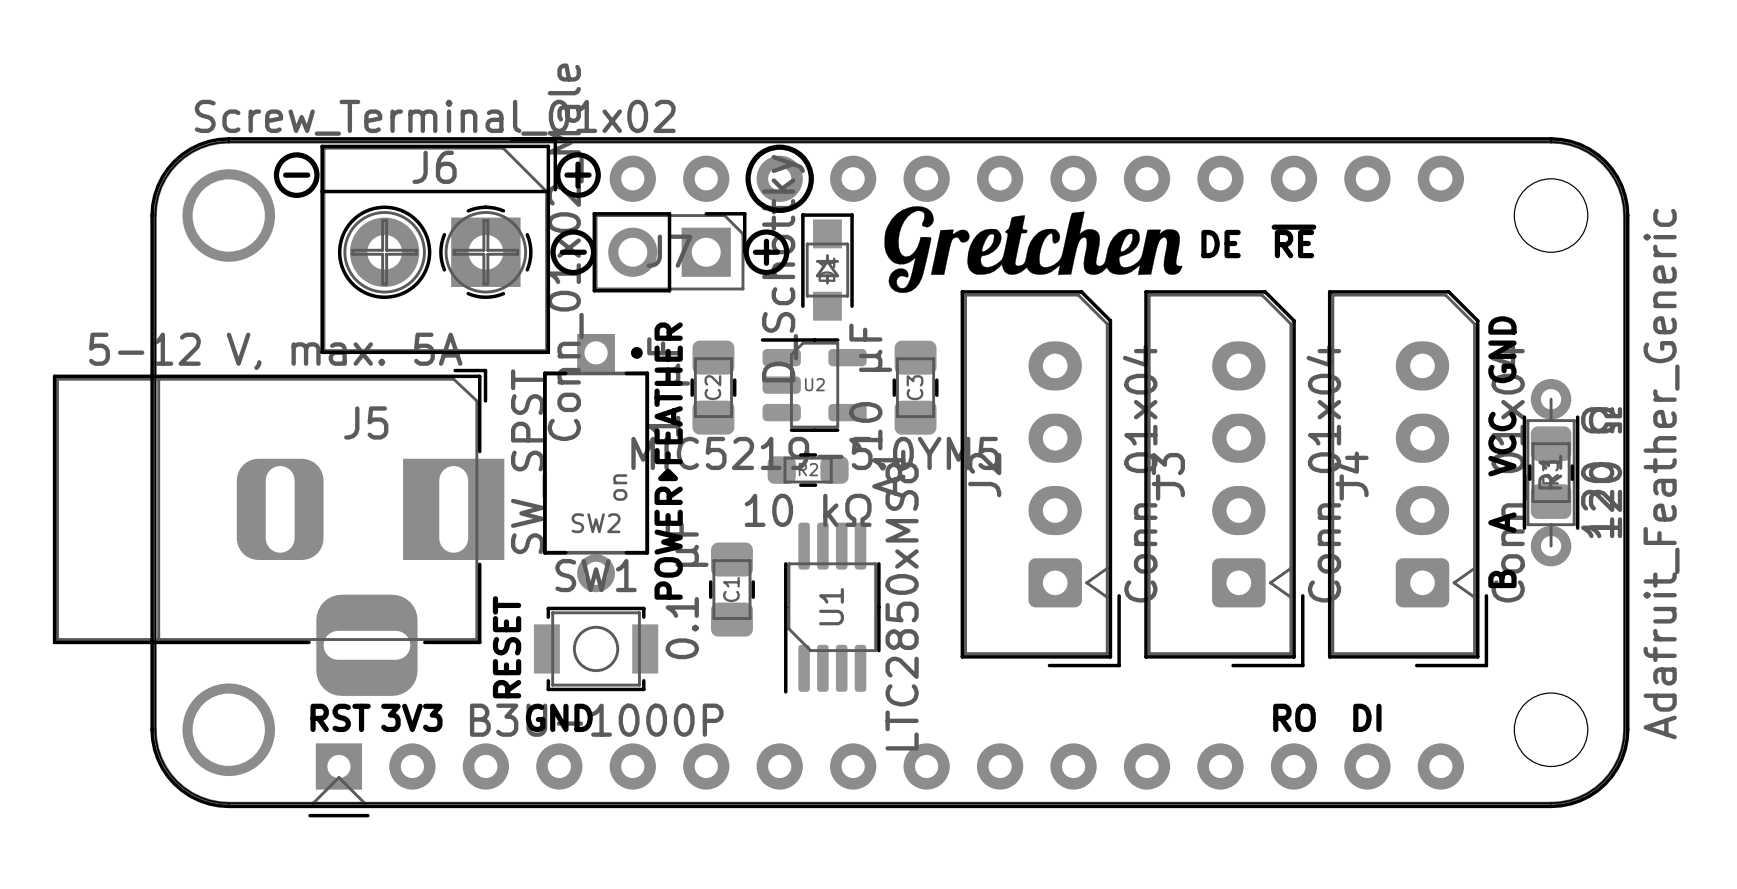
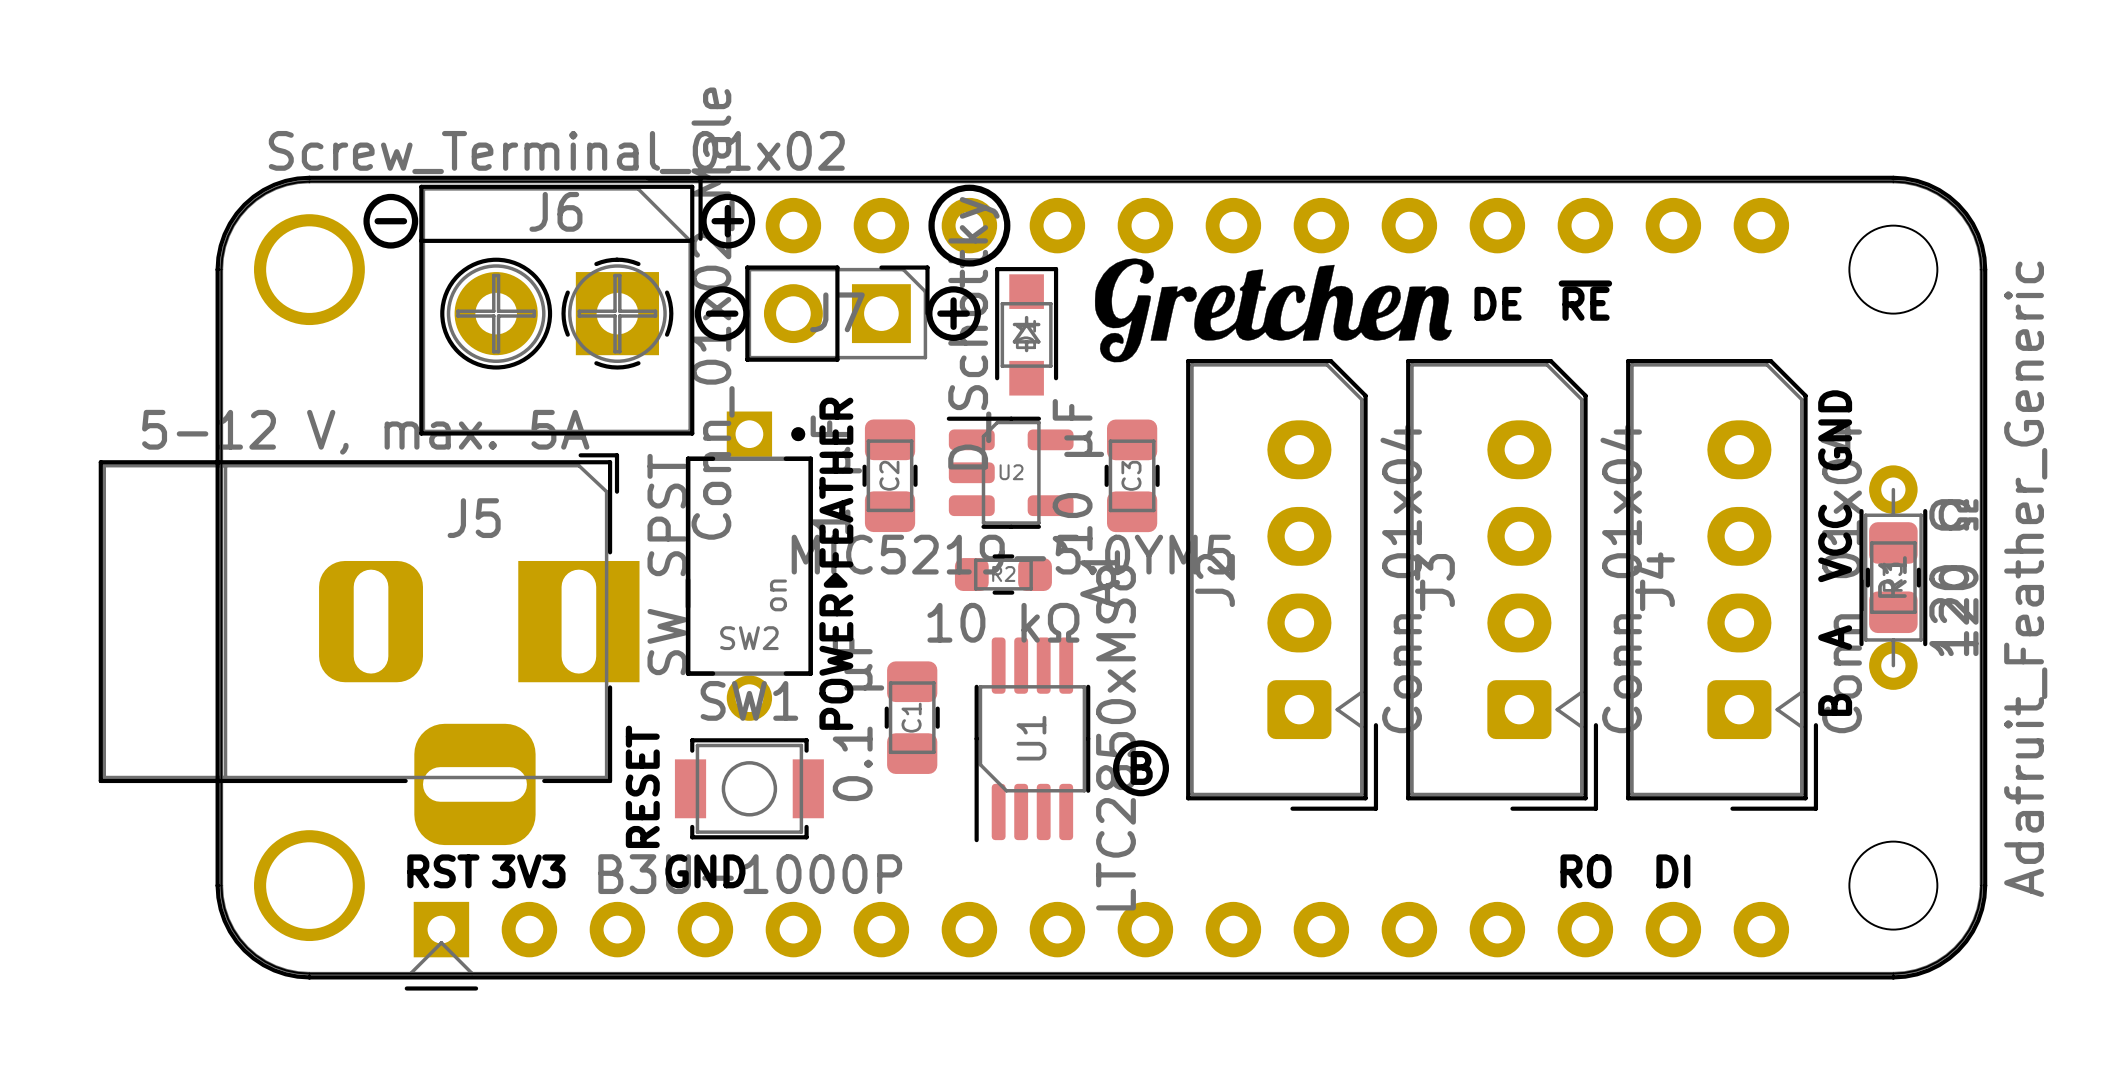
drawing: none -> [1112, 740, 1170, 797]
text: none -> B (1141, 767)

